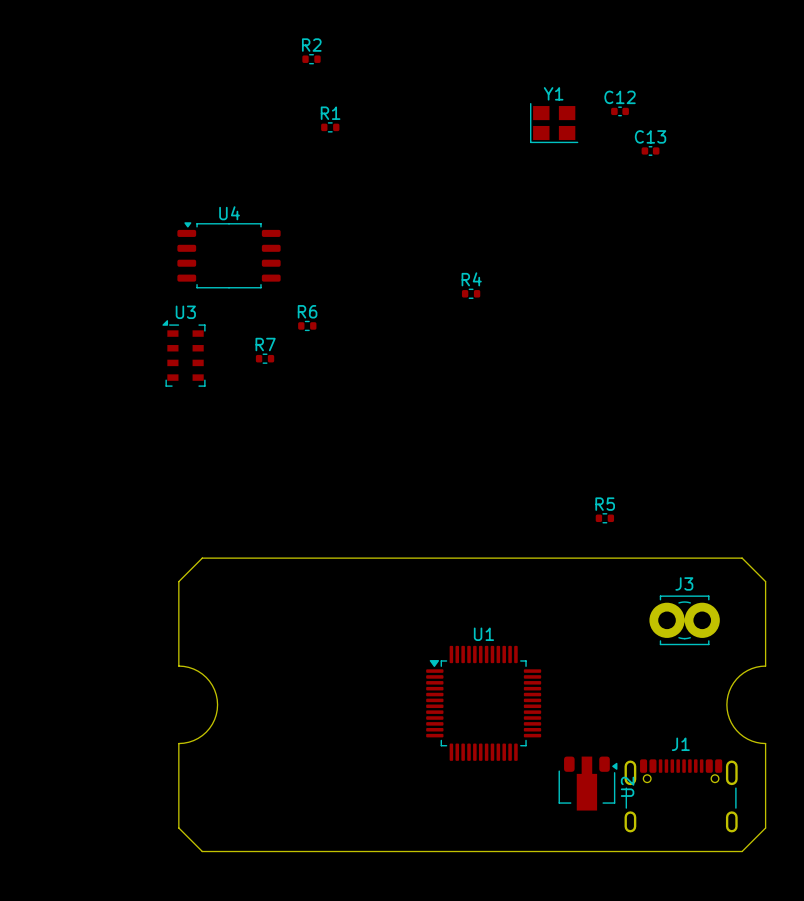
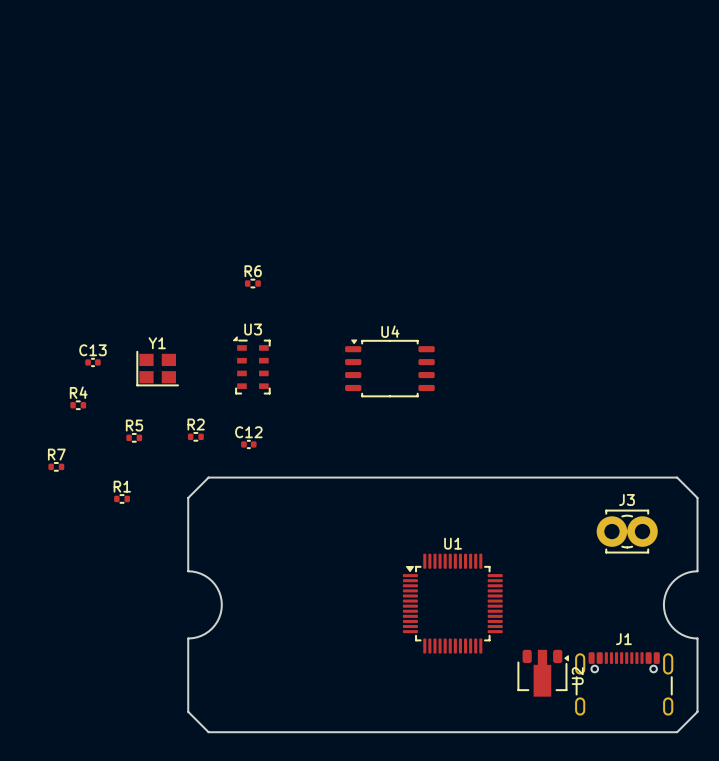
R2 position: (311, 59) -> (195, 436)
C12 position: (620, 111) -> (248, 444)
Y1 position: (554, 123) -> (157, 368)
R1 position: (330, 127) -> (122, 498)
C13 position: (650, 150) -> (92, 362)
U4 position: (229, 255) -> (389, 368)
R4 position: (471, 293) -> (78, 405)
R6 position: (307, 325) -> (252, 283)
U3 position: (184, 353) -> (251, 365)
R7 position: (265, 358) -> (56, 466)
R5 position: (604, 518) -> (134, 437)

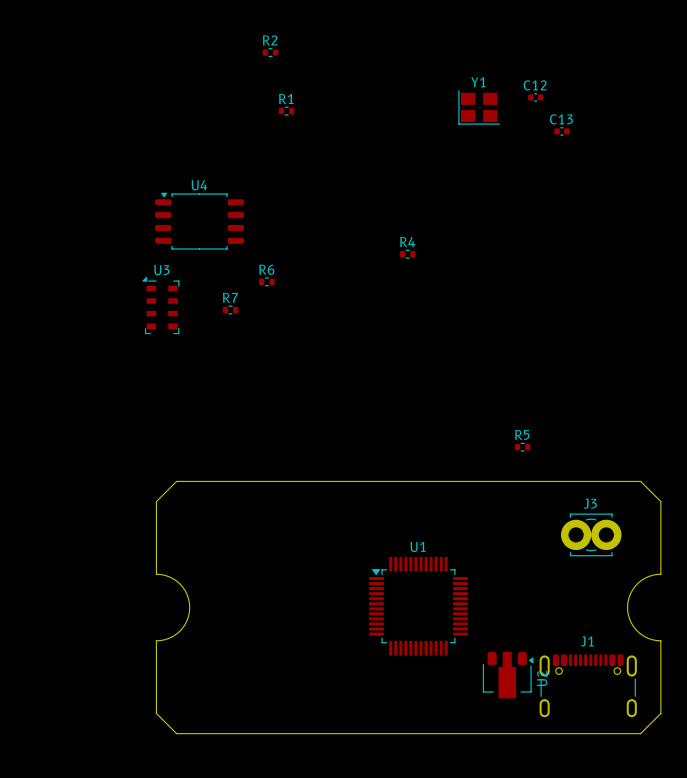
R6 position: (252, 283) -> (266, 281)
C13 position: (92, 362) -> (561, 131)
U3 position: (251, 365) -> (160, 305)
Y1 position: (157, 368) -> (479, 107)
U4 position: (389, 368) -> (199, 221)
R4 position: (78, 405) -> (407, 254)
R2 position: (195, 436) -> (270, 52)
R5 position: (134, 437) -> (522, 447)
C12 position: (248, 444) -> (535, 97)
R7 position: (56, 466) -> (230, 309)
R1 position: (122, 498) -> (286, 111)

